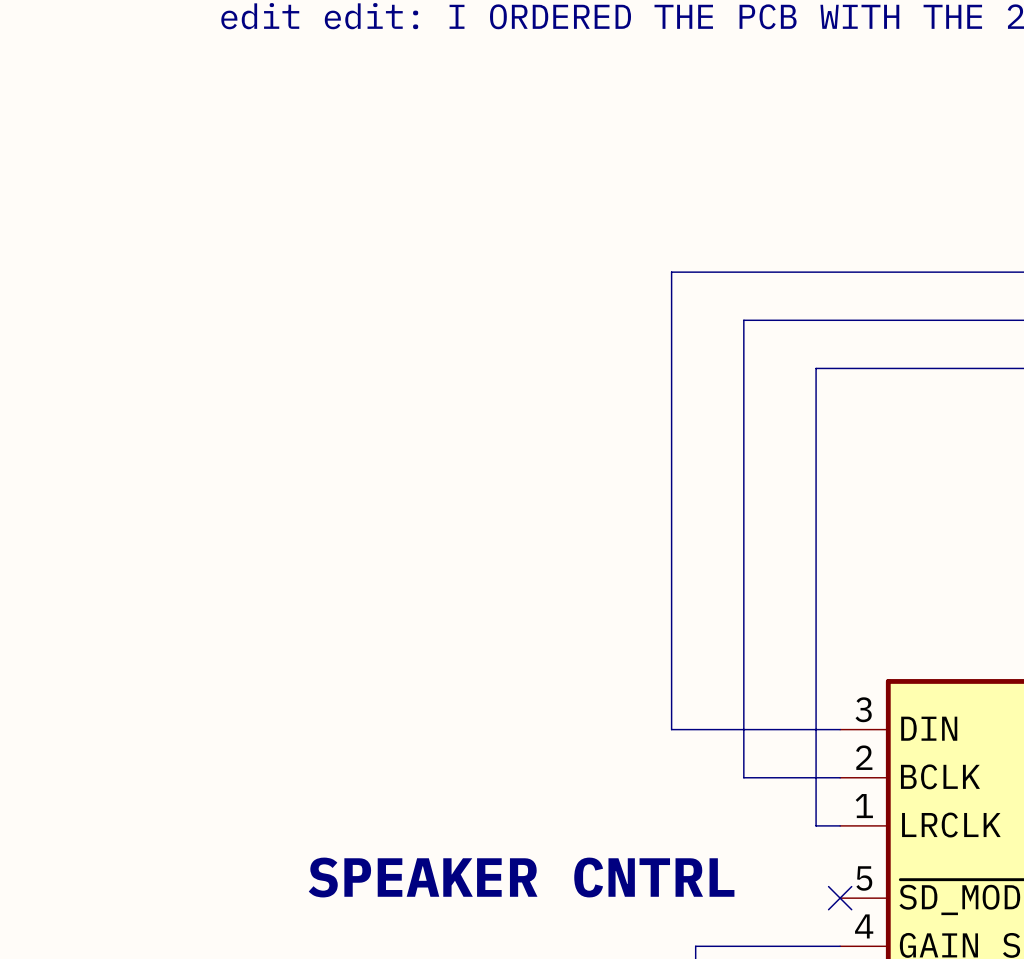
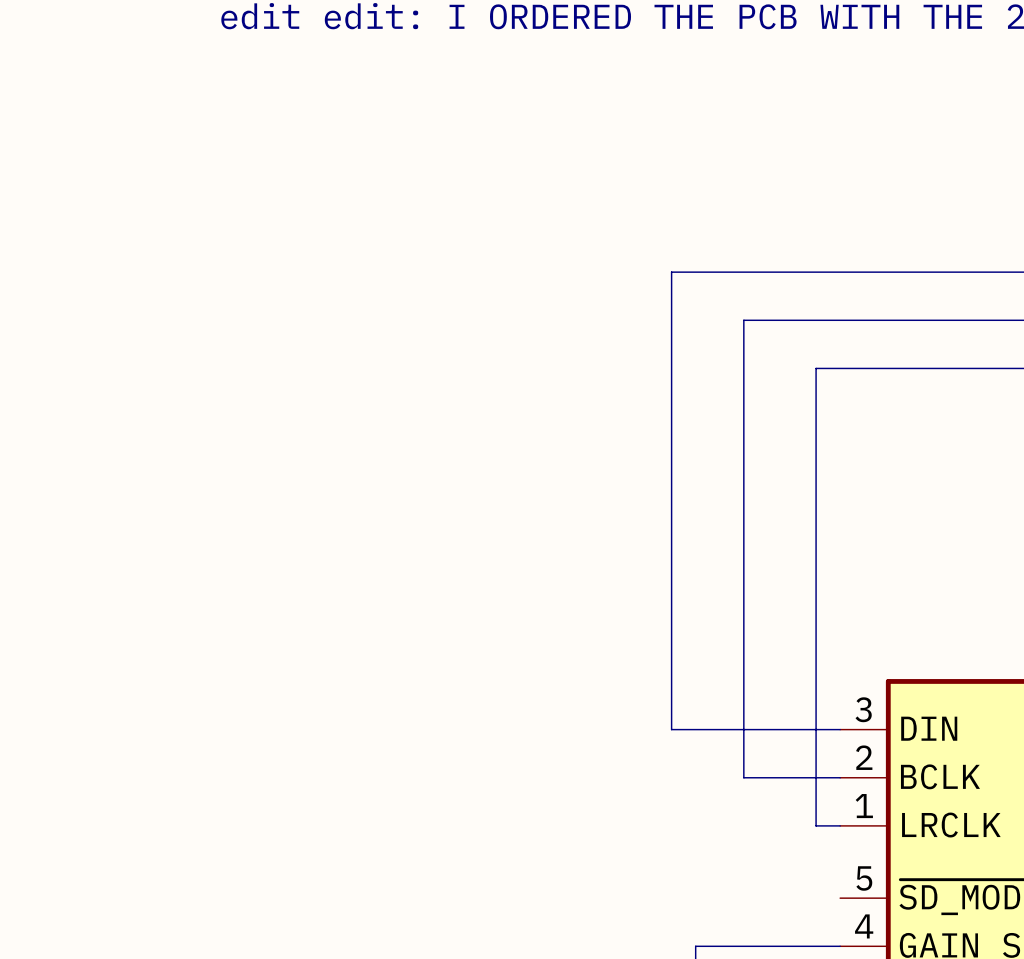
text: SPEAKER CNTRL (521, 877) -> none
no-connect mark: (840, 898) -> none

